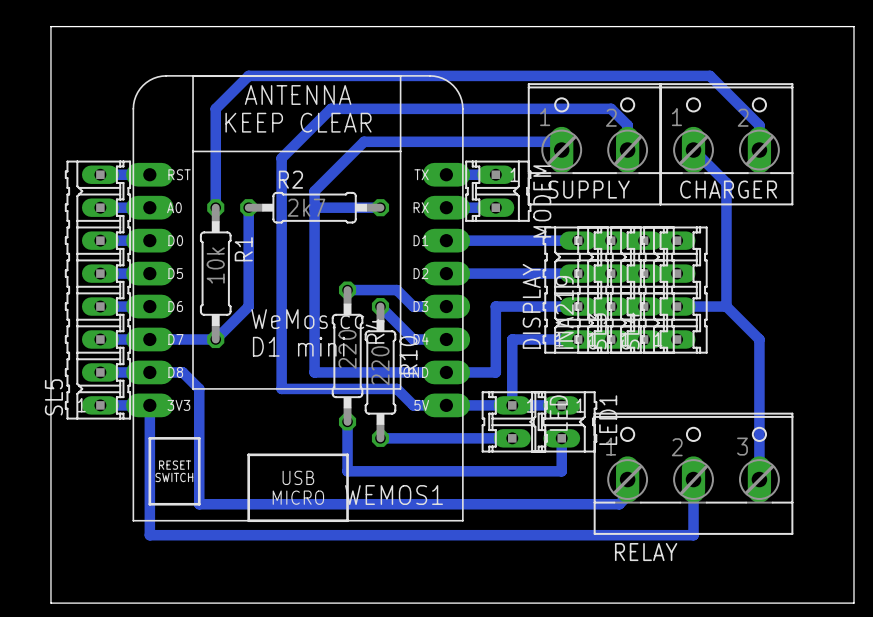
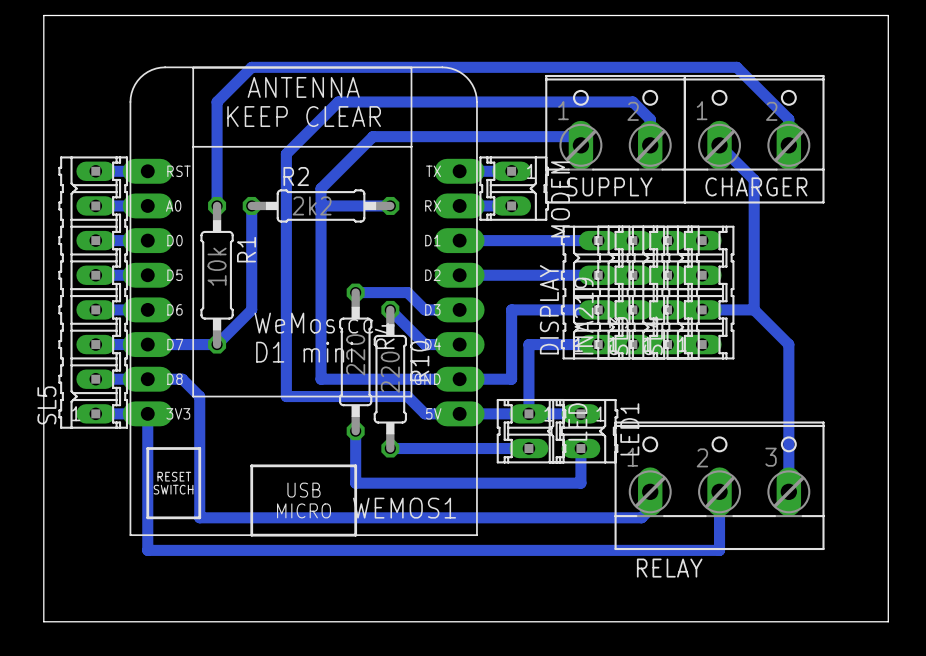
R2 value: 2k7 (306, 207) -> 2k2 (312, 205)

